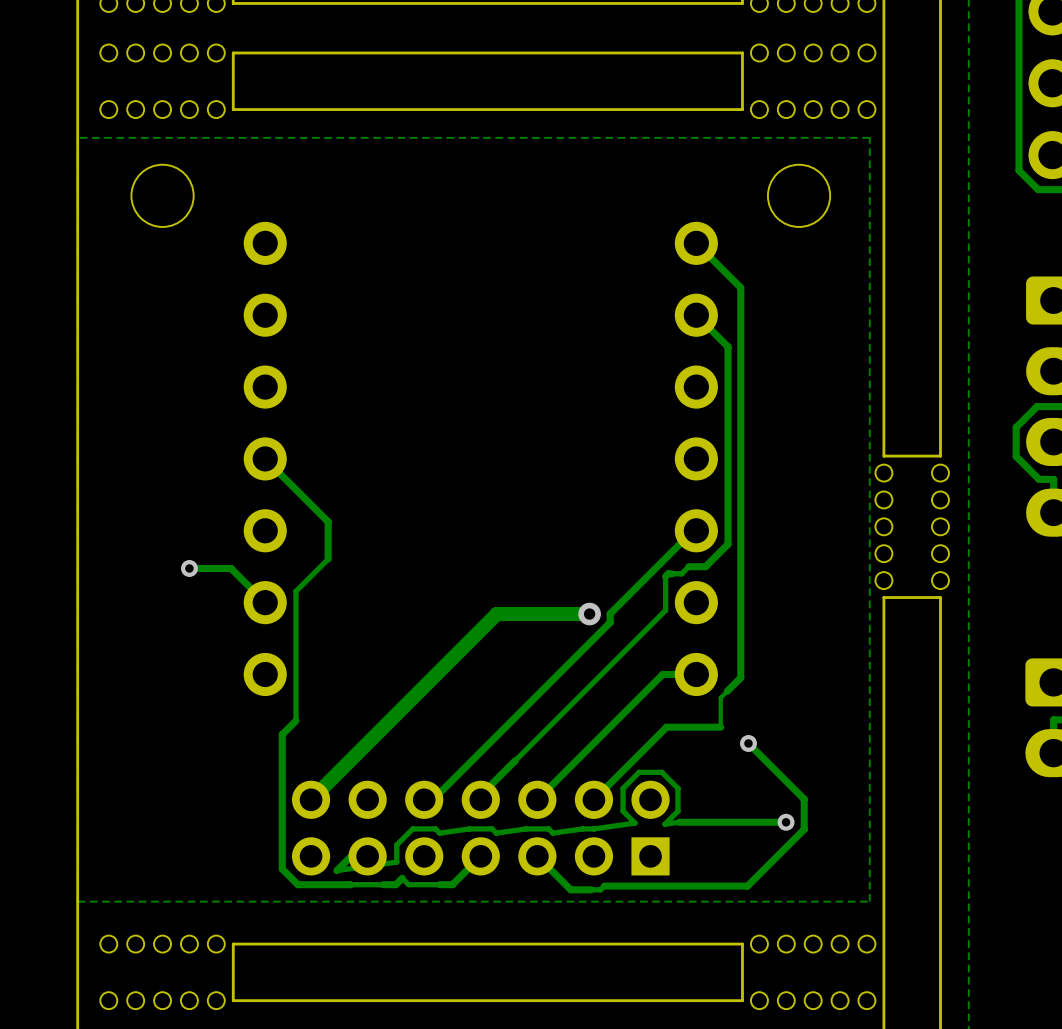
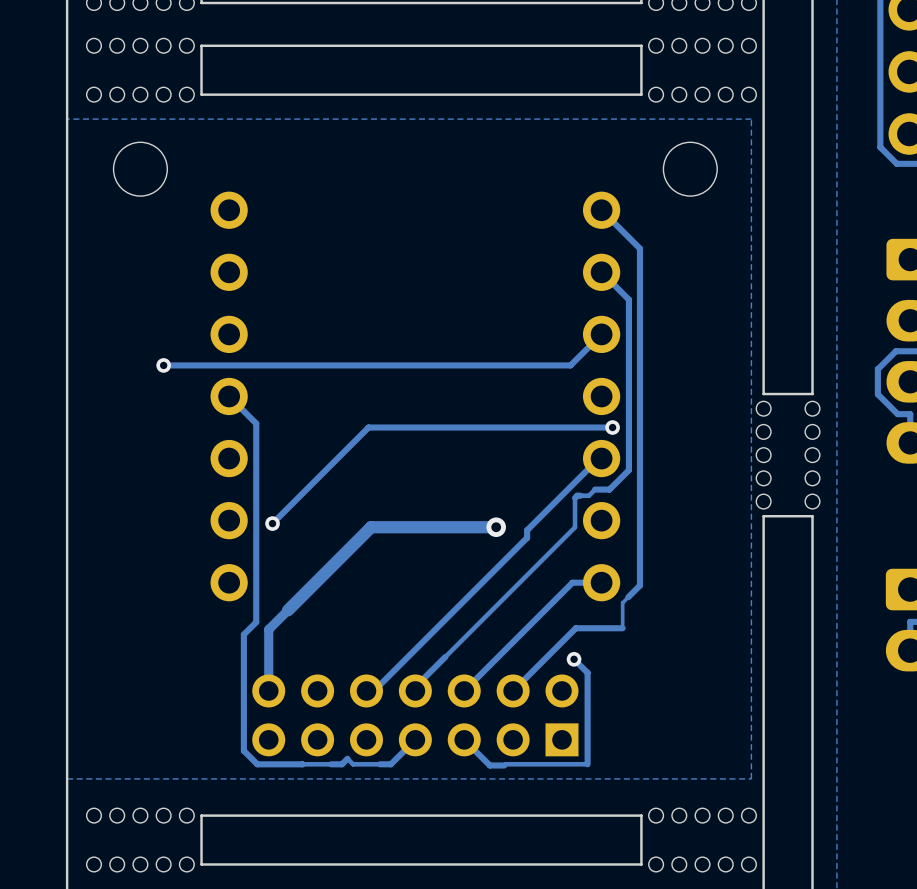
track: none -> (601, 334) (570, 365) (163, 365)
via: none -> (163, 365)
track: (296, 490) (328, 521) (328, 559) (295, 591) (295, 720) -> (256, 423) (255, 622)
track: none -> (612, 427) (368, 427) (272, 523)
via: none -> (612, 427)
track: (189, 568) (231, 568) (265, 602) -> none
via: (189, 568) -> none
via: none -> (272, 523)
track: (589, 614) (496, 614) (311, 799) -> (496, 527) (371, 527) (268, 629) (268, 690)
via position: (589, 614) -> (496, 527)
track: (748, 743) (804, 799) (804, 829) (747, 886) (604, 886) (600, 889) (570, 889) (567, 886) -> (574, 659) (587, 672) (587, 764) (489, 765)
via: (748, 743) -> none
via: none -> (574, 659)
track: (786, 822) (678, 822) (664, 824) (677, 811) (677, 788) (661, 772) (639, 772) (623, 788) (623, 811) (635, 823) (552, 833) (548, 828) (526, 828) (496, 833) (492, 828) (469, 828) (439, 833) (435, 828) (412, 828) (396, 845) (396, 862) (336, 870) (351, 856) (367, 856) -> none
via: (786, 822) -> none

